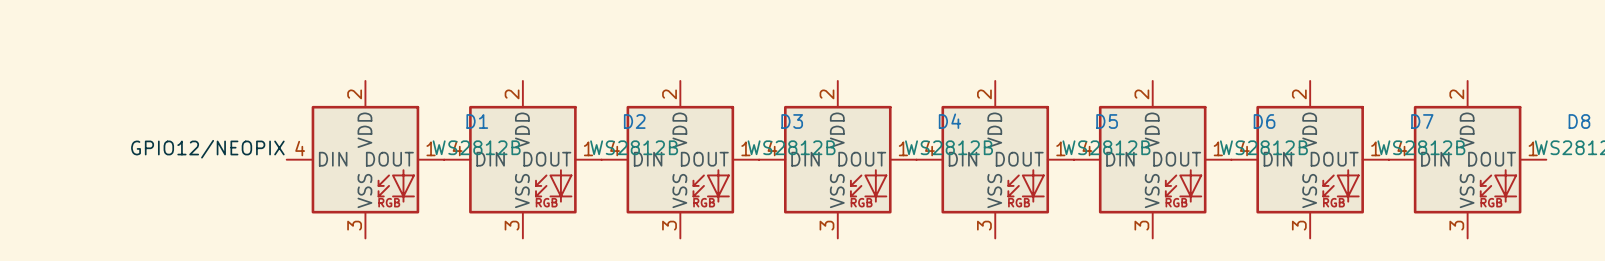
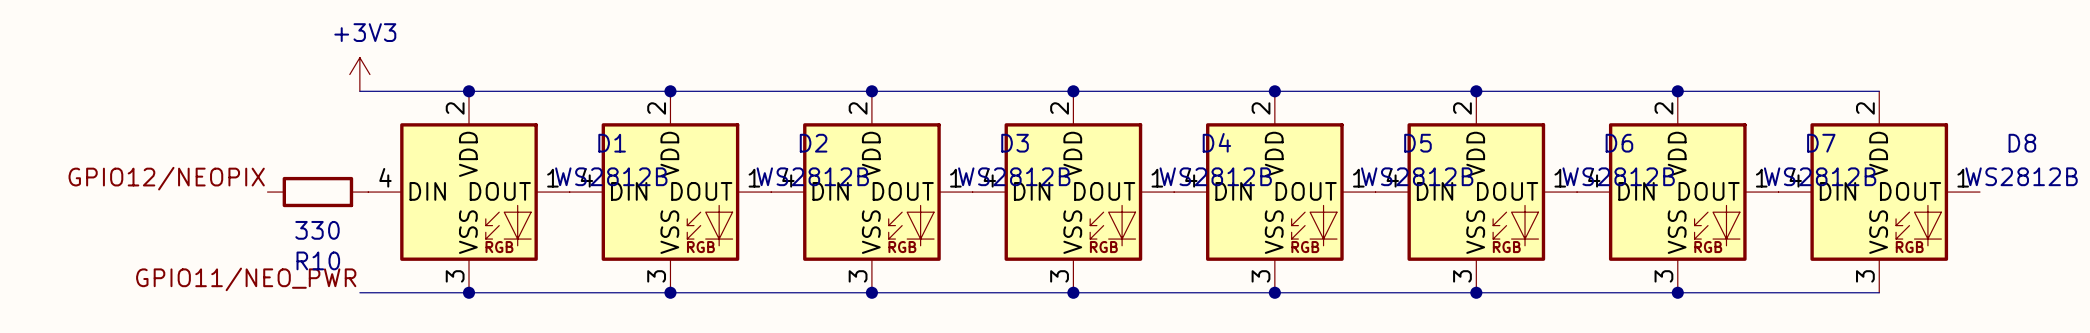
power symbol: none -> +3V3 (359, 74)
wire: none -> (359, 91) (1879, 91)
junction: none -> (469, 91)
junction: none -> (670, 91)
junction: none -> (871, 91)
junction: none -> (1073, 91)
junction: none -> (1274, 91)
junction: none -> (1476, 91)
junction: none -> (1677, 91)
label position: GPIO12/NEOPIX (207, 149) -> GPIO12/NEOPIX (166, 178)
R10: none -> 330 (317, 192)
label: none -> GPIO11/NEO_PWR (246, 279)
wire: none -> (359, 292) (1879, 292)
junction: none -> (469, 292)
junction: none -> (670, 292)
junction: none -> (871, 292)
junction: none -> (1073, 292)
junction: none -> (1274, 292)
junction: none -> (1476, 292)
junction: none -> (1677, 292)

